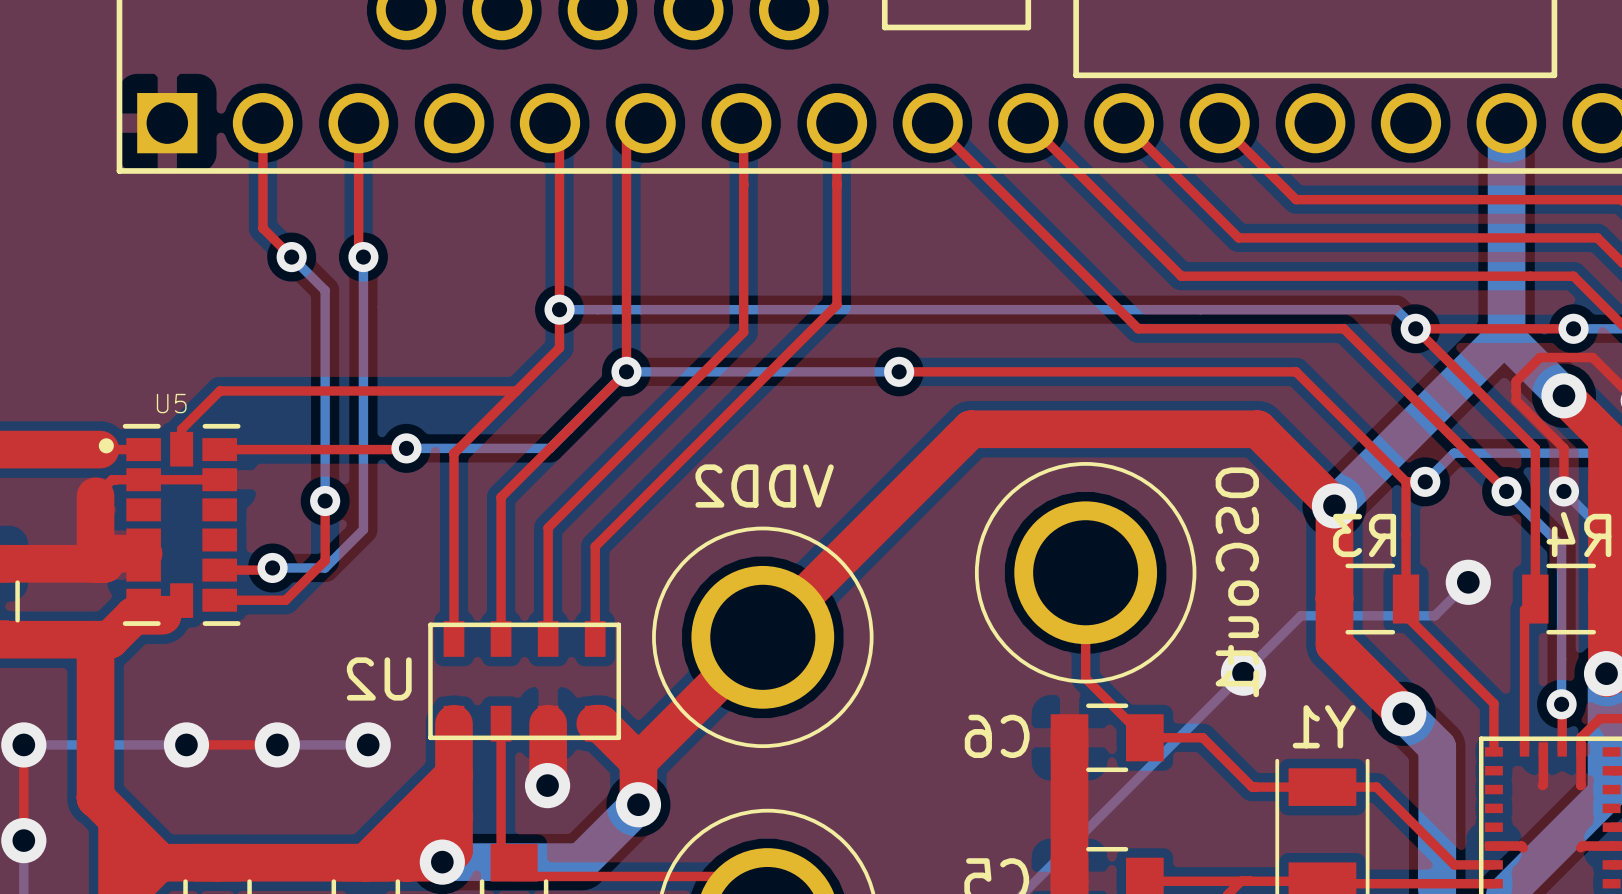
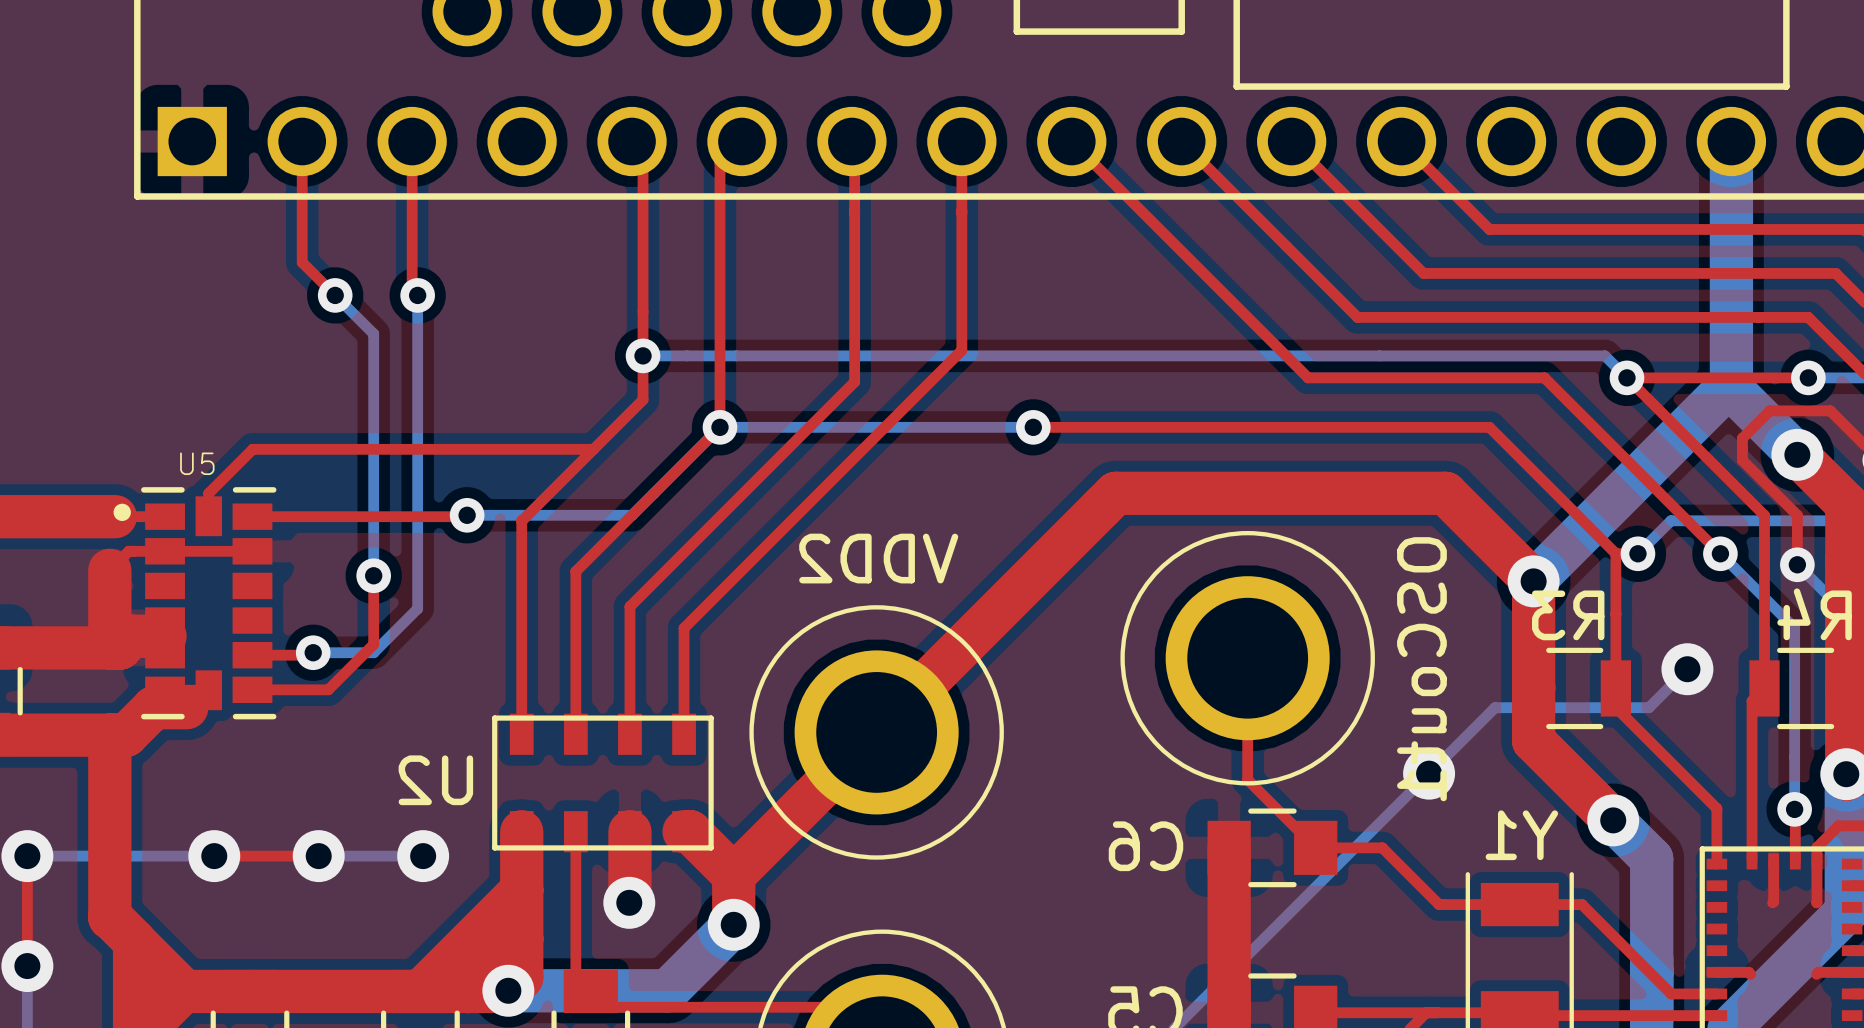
via position: (1506, 491) -> (1720, 553)

